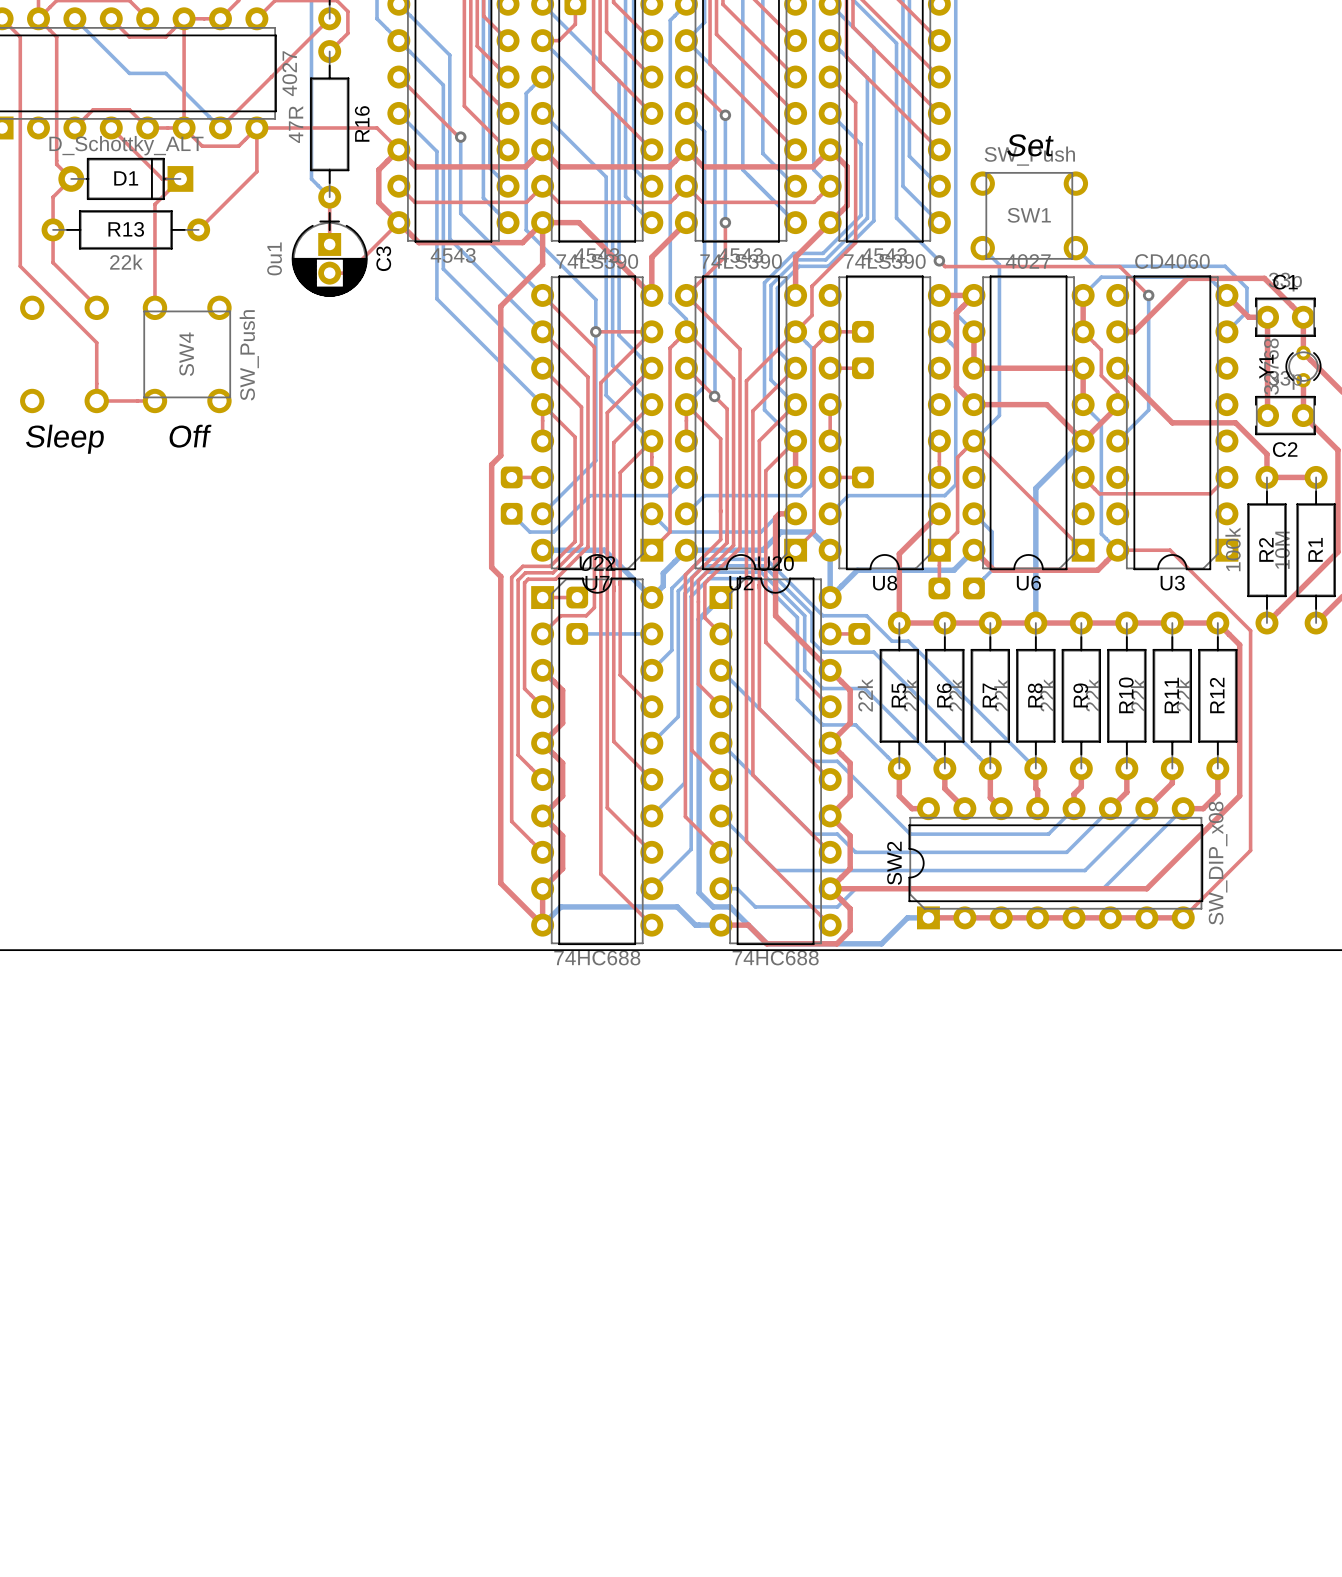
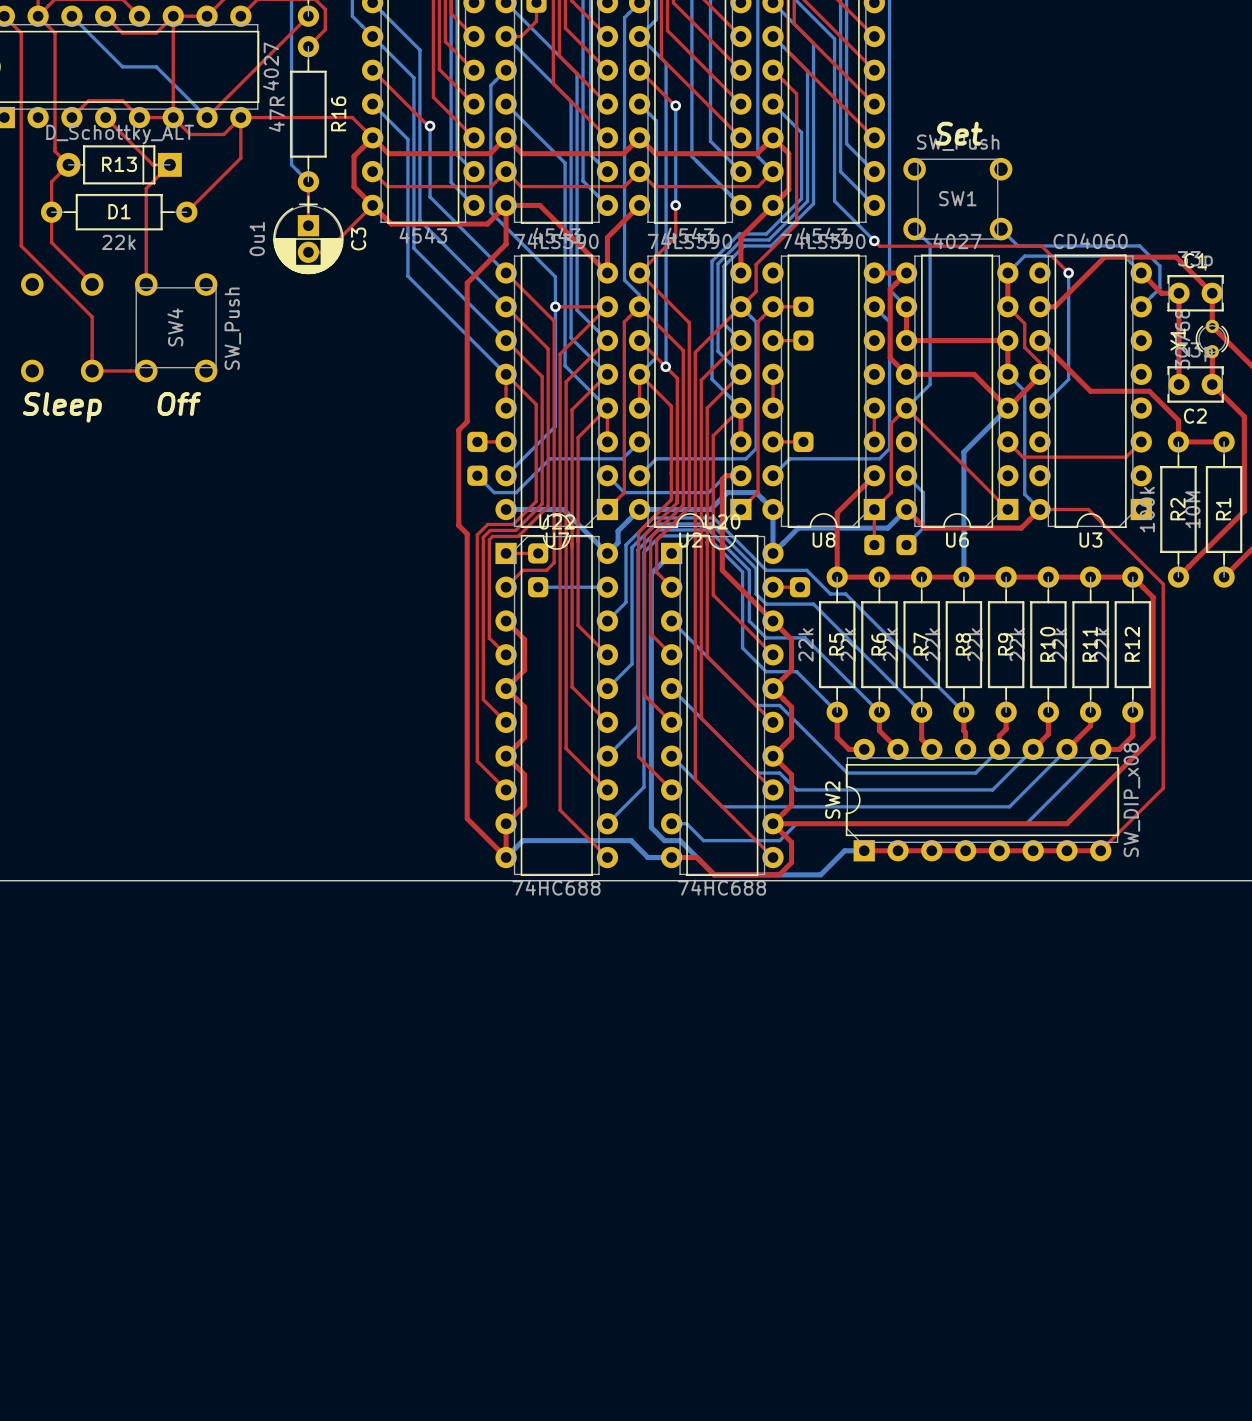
D1 name position: D1 (126, 178) -> D1 (119, 211)
R13 name position: R13 (126, 229) -> R13 (119, 164)

